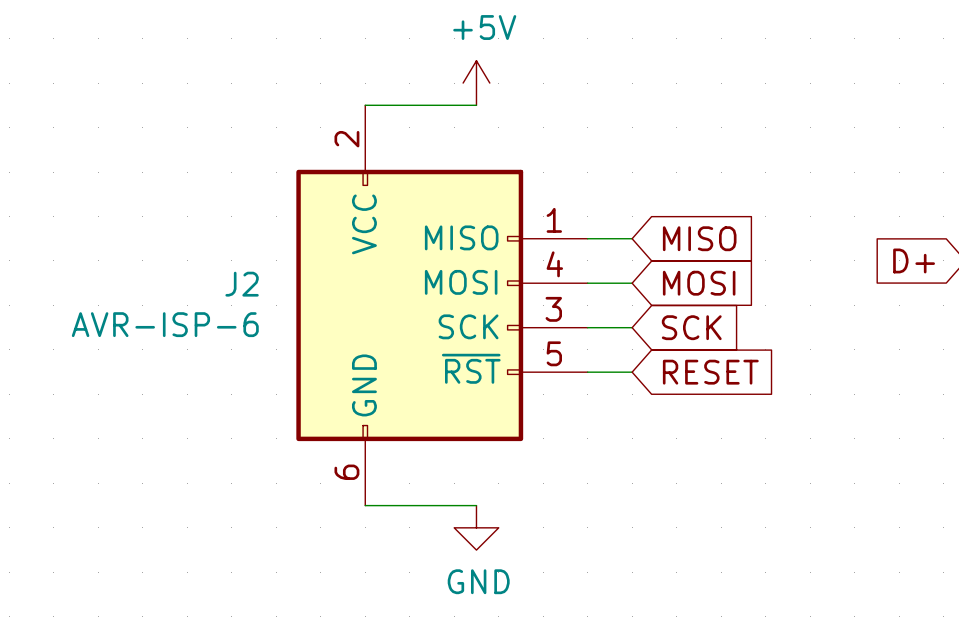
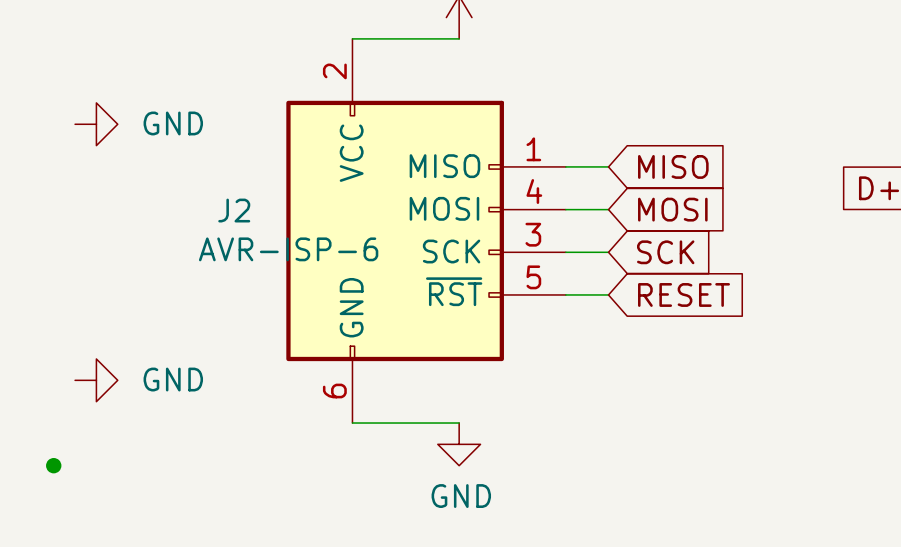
power symbol: none -> GND (96, 124)
J2 value position: AVR-ISP-6 (165, 324) -> AVR-ISP-6 (288, 249)
power symbol: none -> GND (96, 380)
junction: none -> (53, 465)

